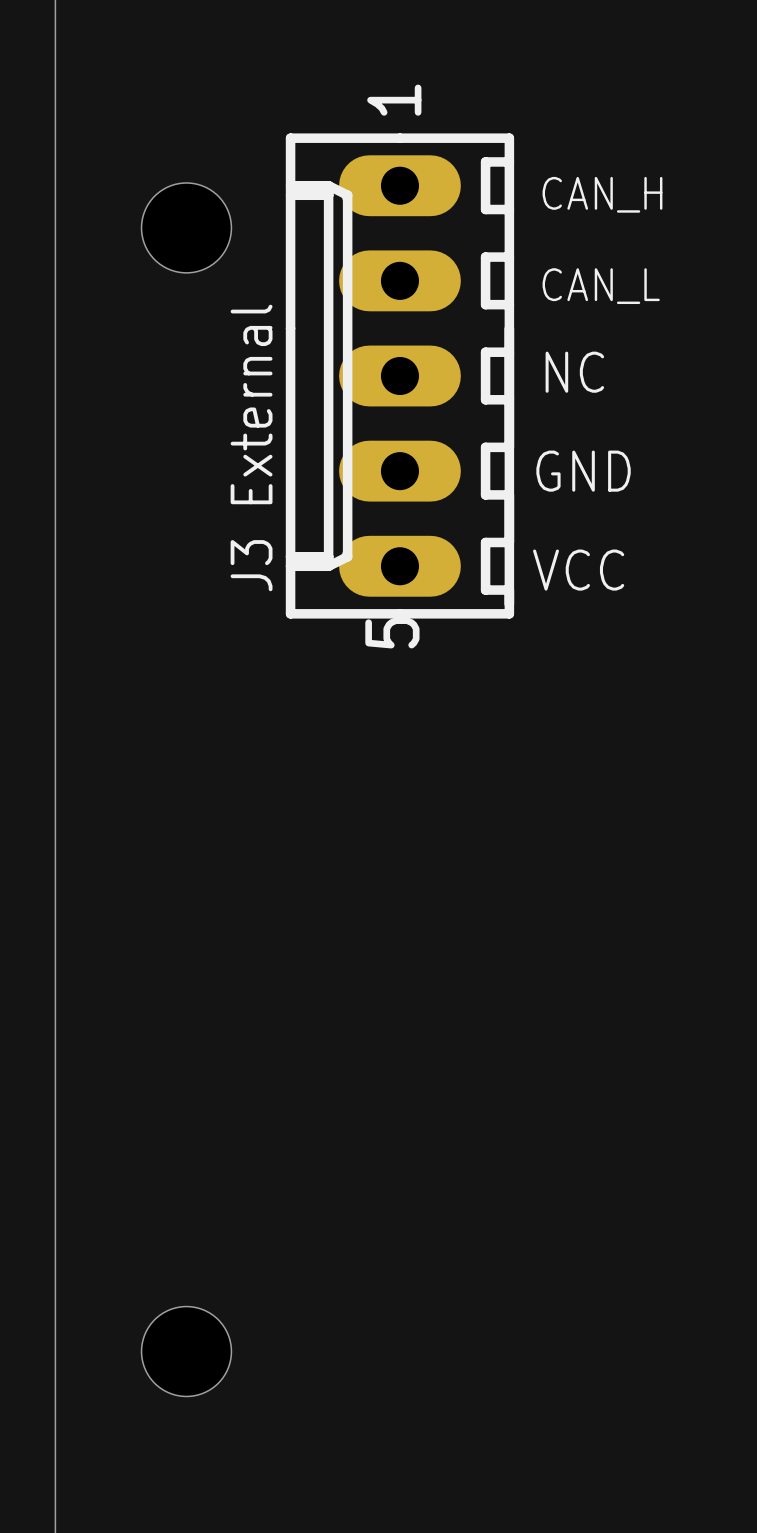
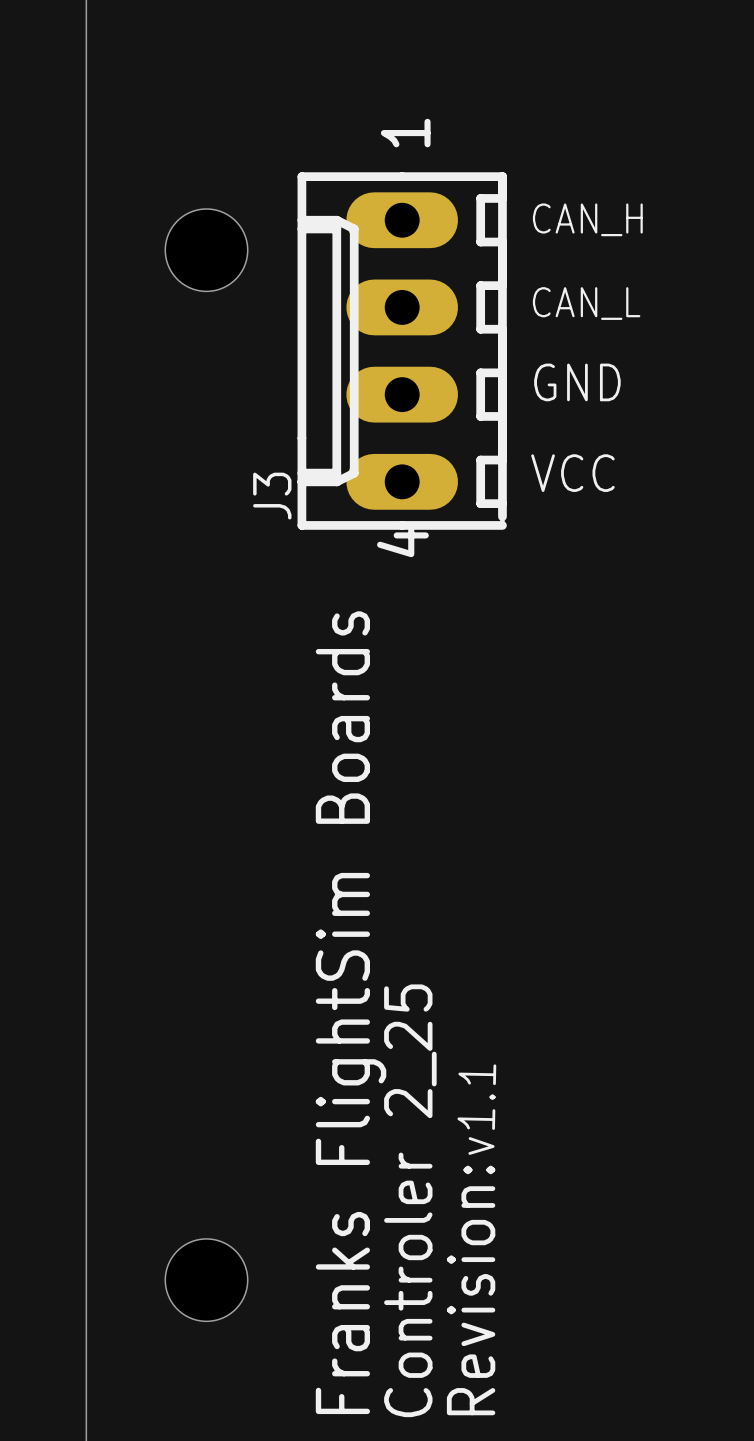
J3 footprint: [285, 133, 515, 619] -> [297, 172, 507, 530]
text: NC (574, 372) -> GND (577, 382)
J3 value: External (251, 404) -> none
text: GND (583, 471) -> none
text position: VCC (578, 570) -> VCC (572, 473)
text: none -> Franks FlightSim Boards (351, 1012)
text: none -> v1.1 (476, 1109)
text: none -> Controler 2_25 (410, 1200)
text: none -> Revision: (471, 1290)

